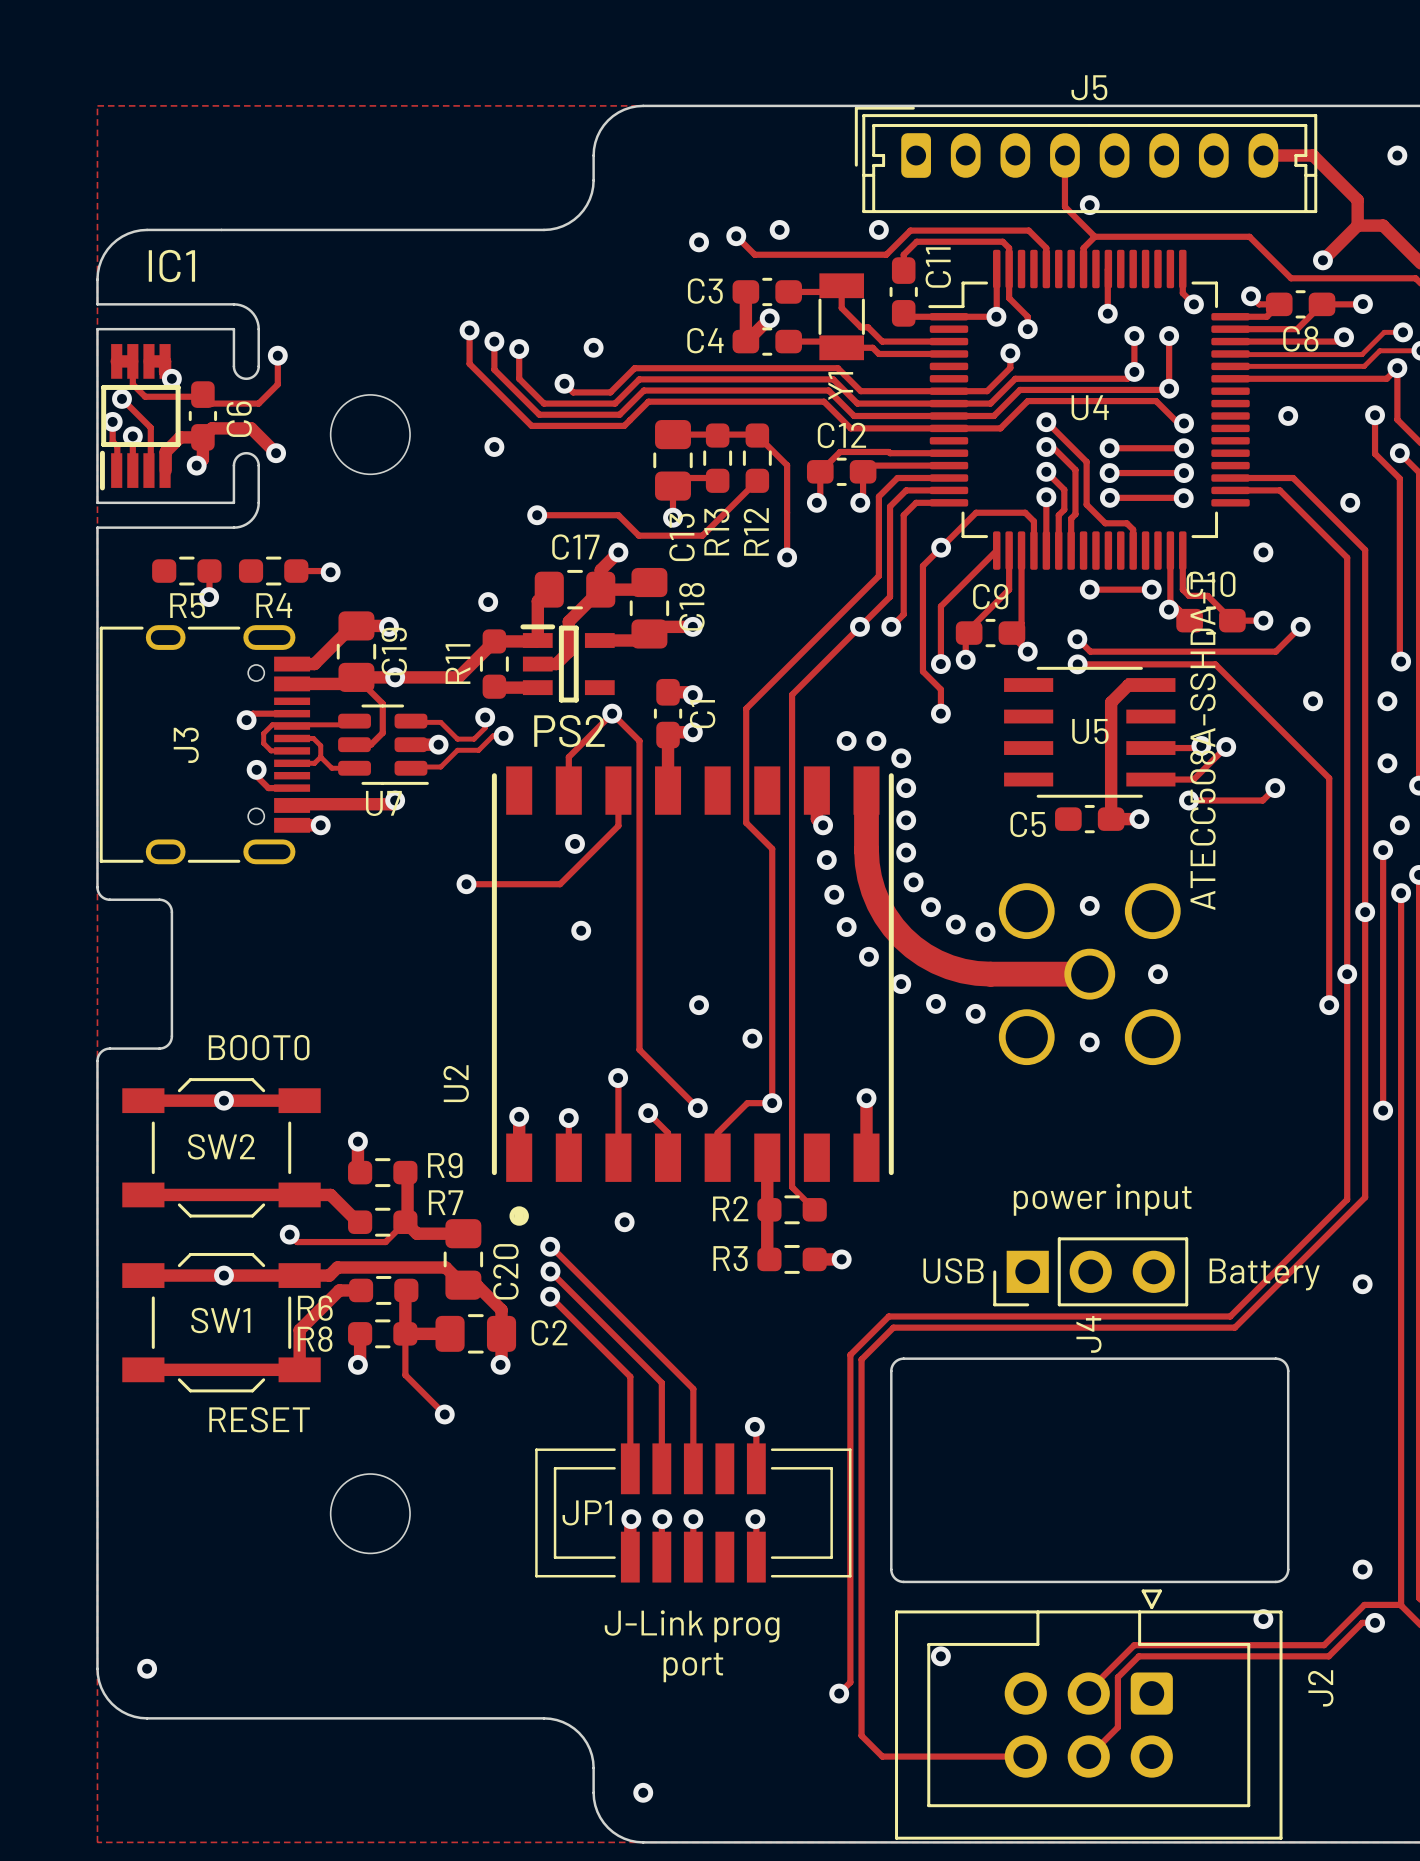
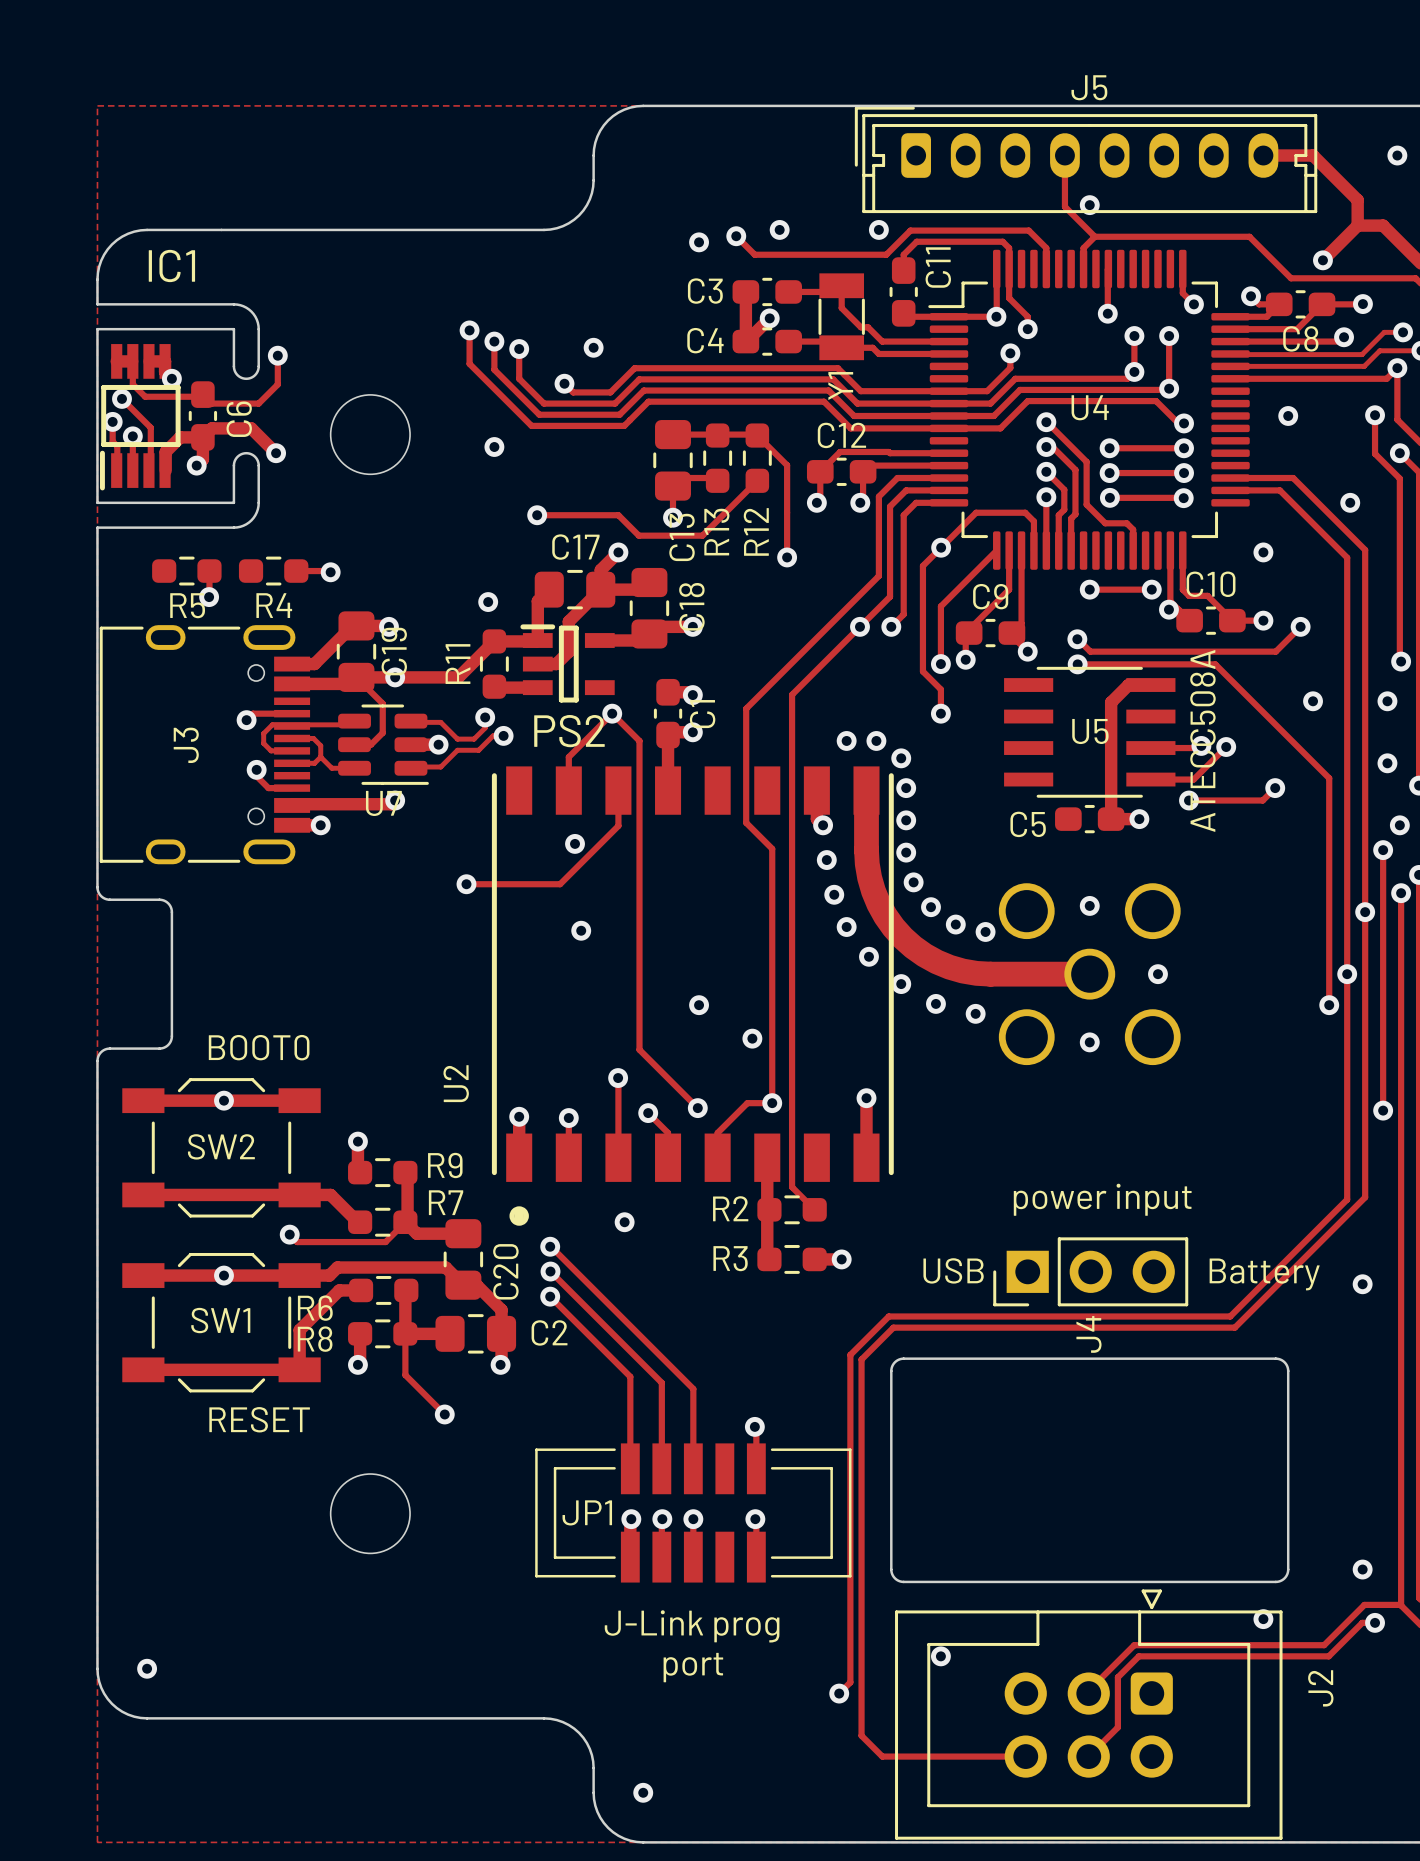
U5 value: ATECC508A-SSHDA-T (1202, 741) -> ATECC508A (1202, 741)

